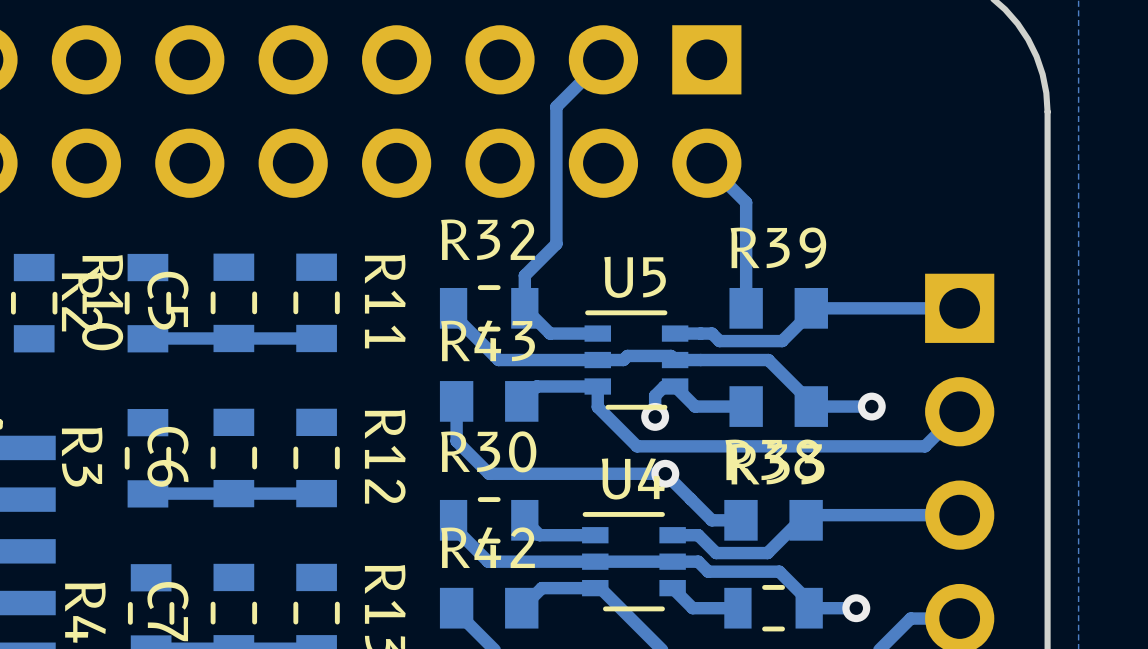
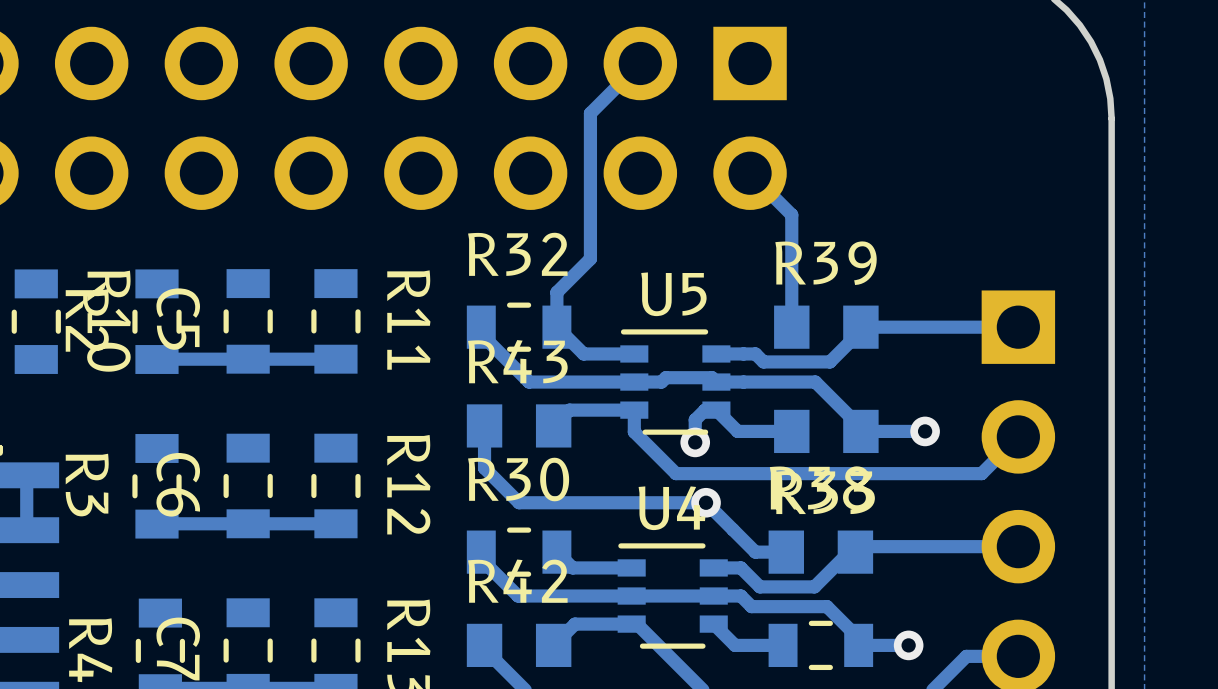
track: none -> (26, 475) (26, 530)

